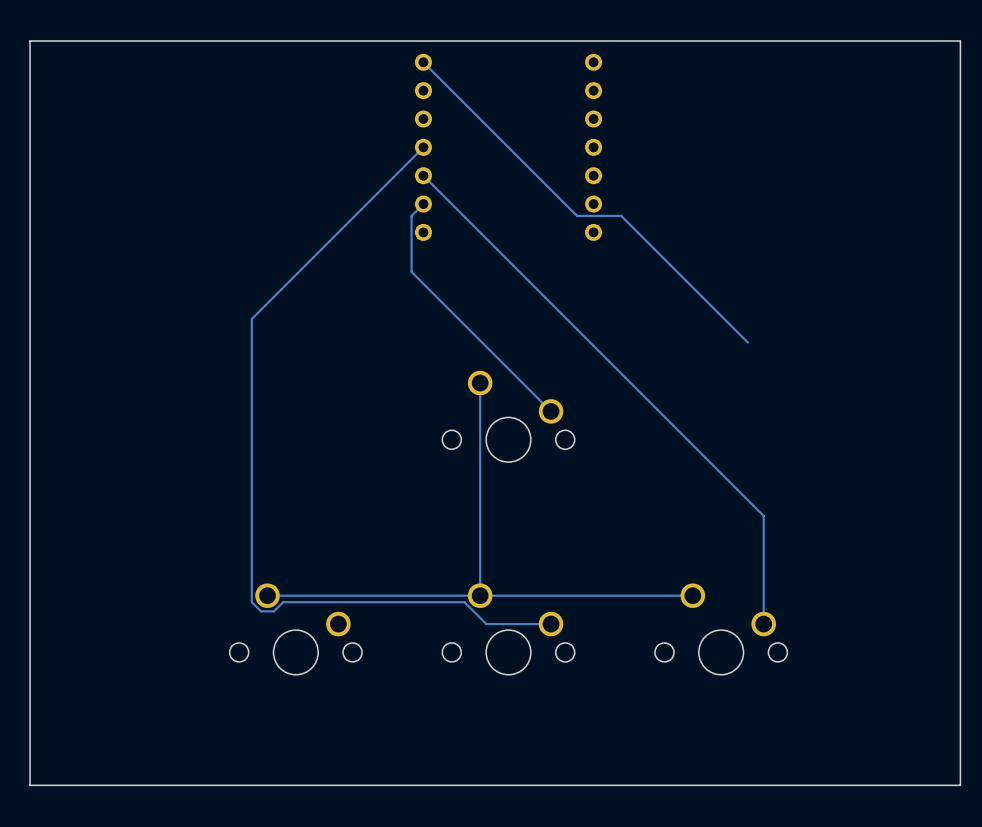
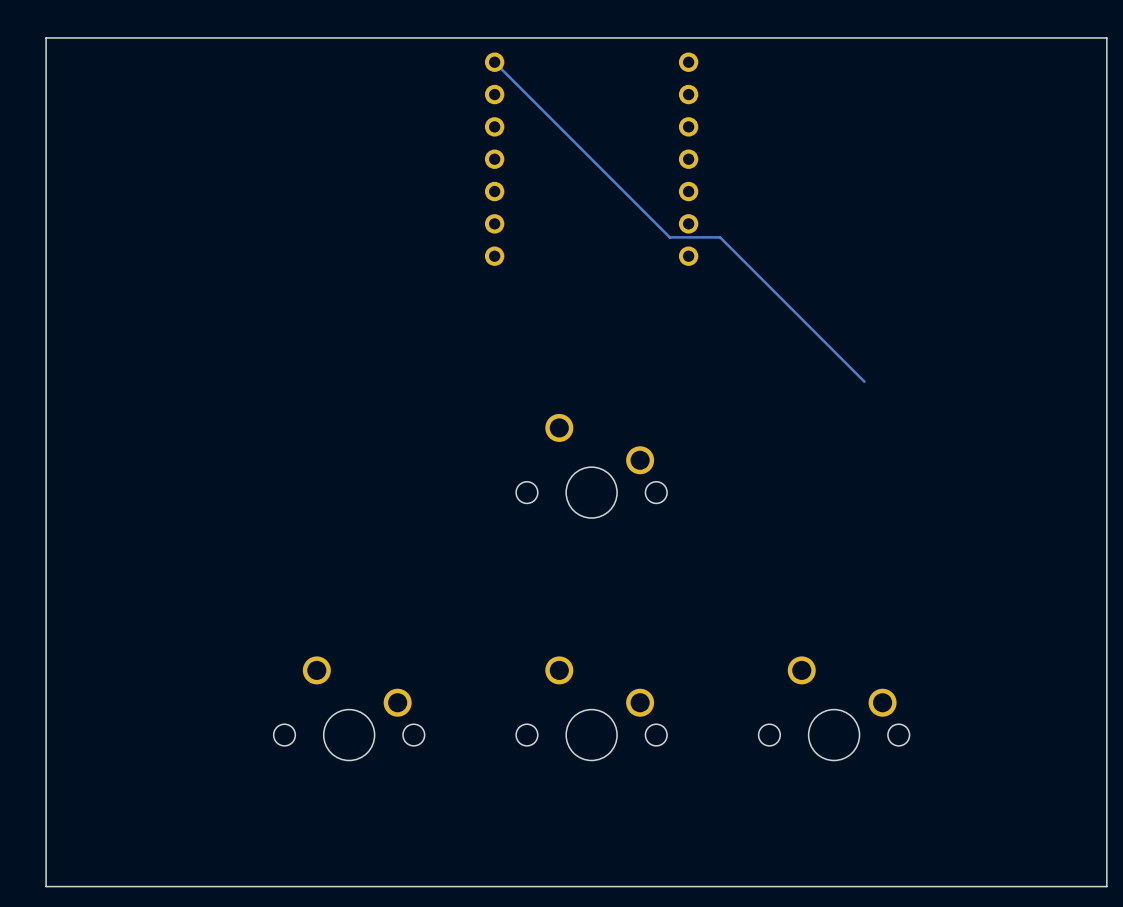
track: (423, 147) (251, 318) (251, 602) (261, 611) (273, 611) (283, 602) (464, 602) (486, 624) (551, 624) -> none
track: (423, 175) (763, 515) (763, 624) -> none
track: (423, 204) (411, 215) (411, 271) (551, 411) -> none
track: (480, 383) (480, 595) -> none
track: (692, 595) (267, 595) -> none

